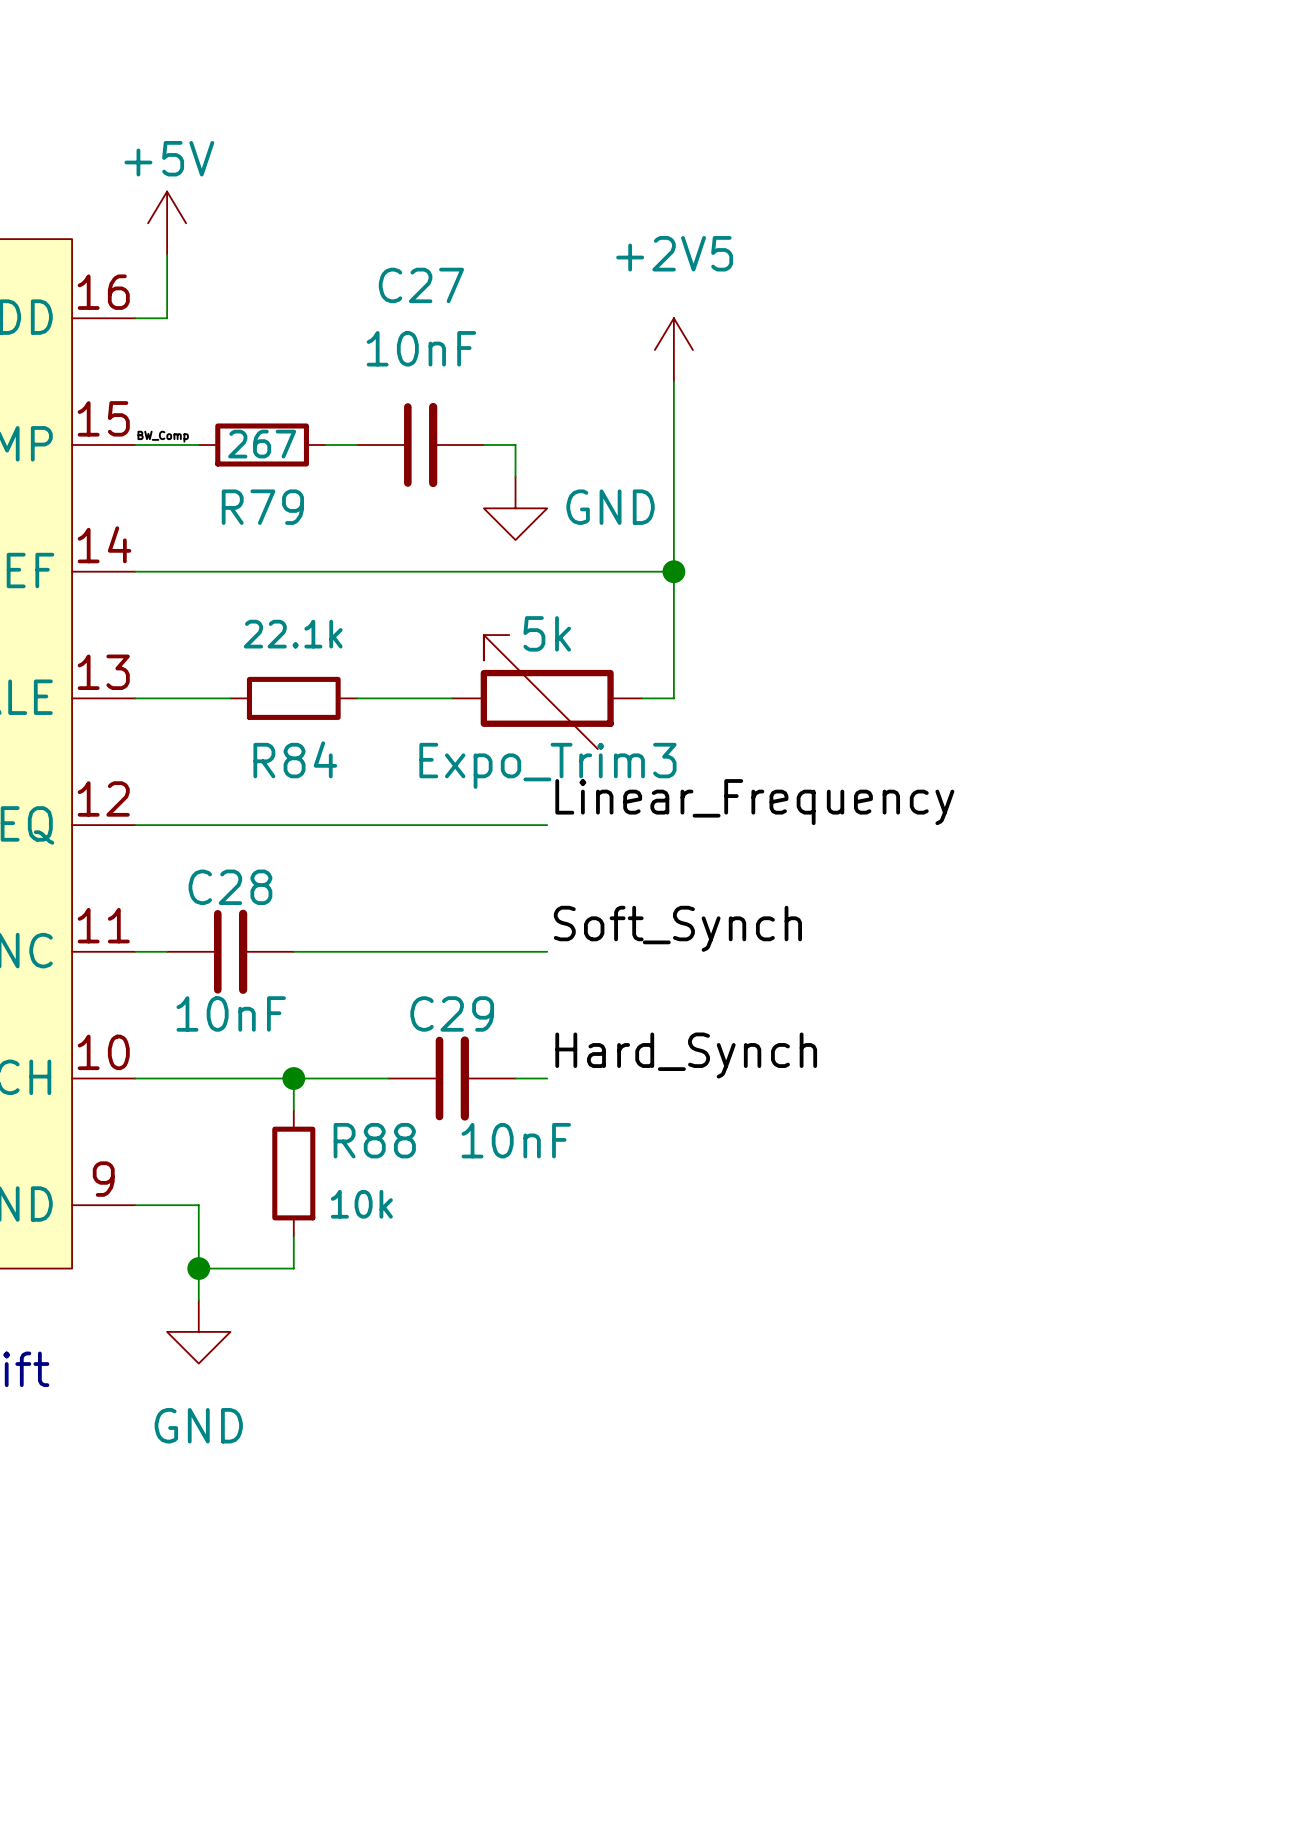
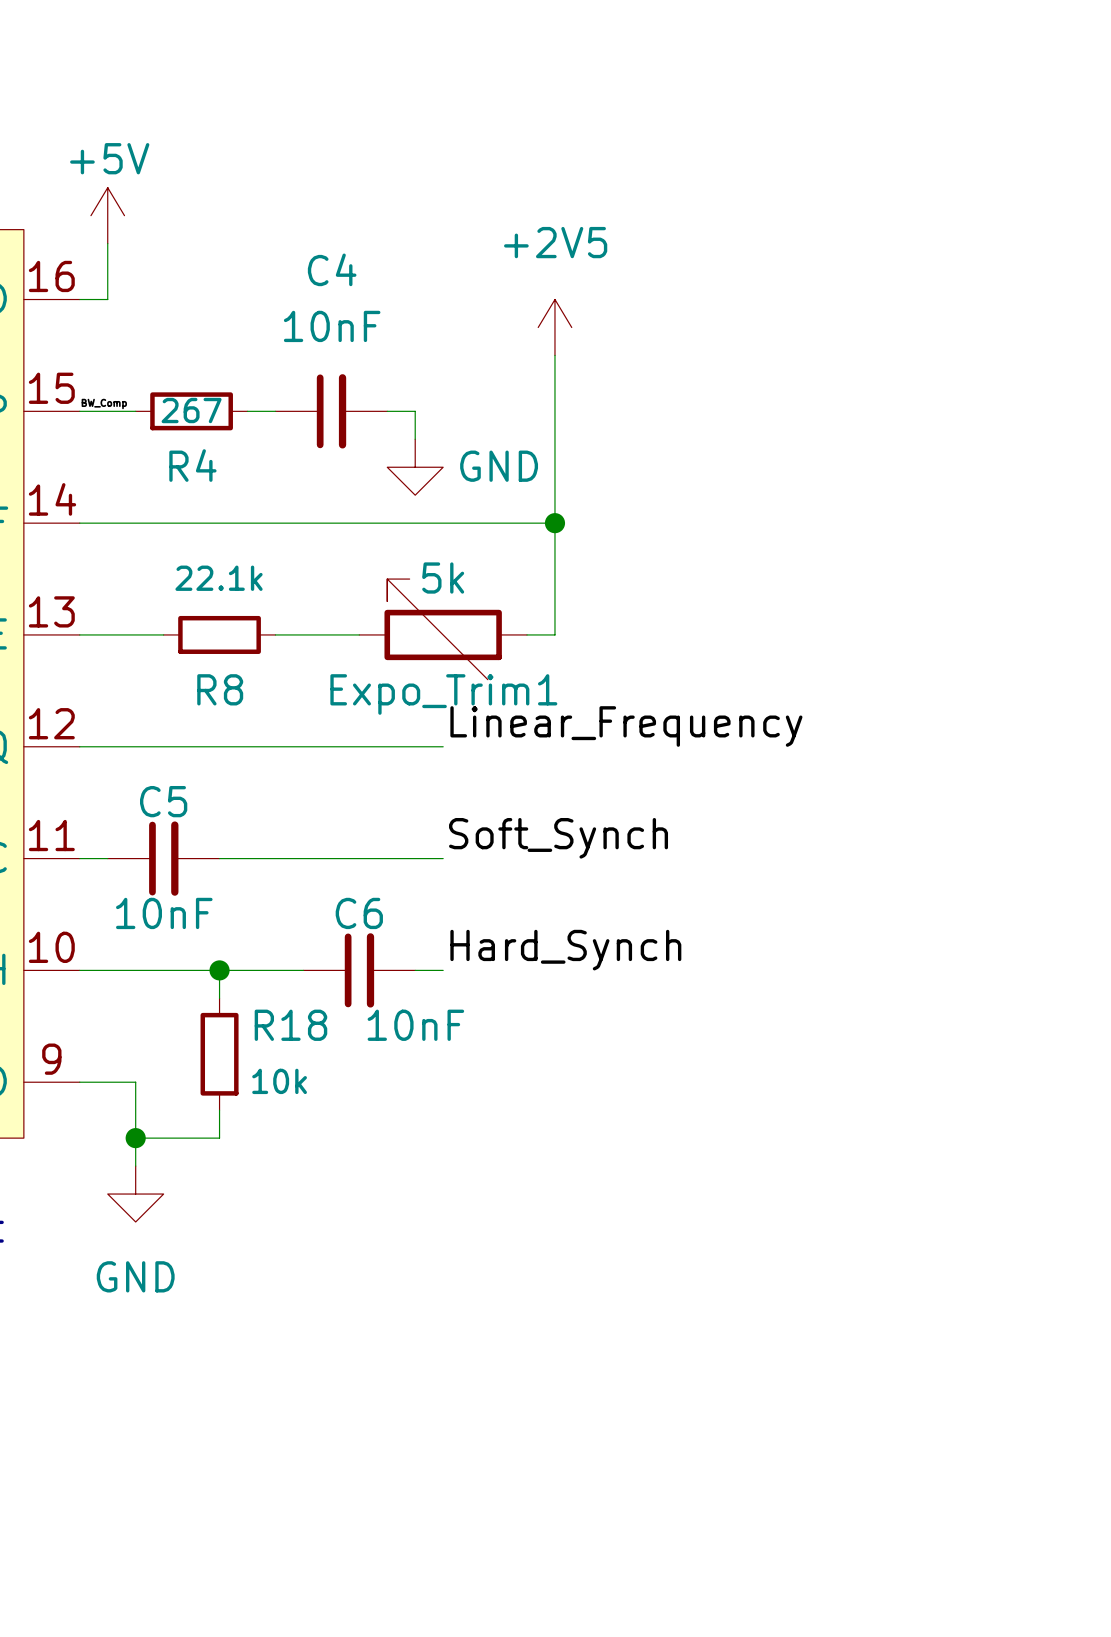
C27 name: C27 (421, 285) -> C4 (332, 269)
R79 name: R79 (262, 507) -> R4 (192, 465)
R84 name: R84 (295, 759) -> R8 (220, 689)
Expo_Trim3 name: Expo_Trim3 (547, 765) -> Expo_Trim1 (443, 694)
C28 name: C28 (230, 887) -> C5 (163, 801)
C29 name: C29 (452, 1013) -> C6 (359, 913)
R88 name: R88 (374, 1140) -> R18 (290, 1025)

